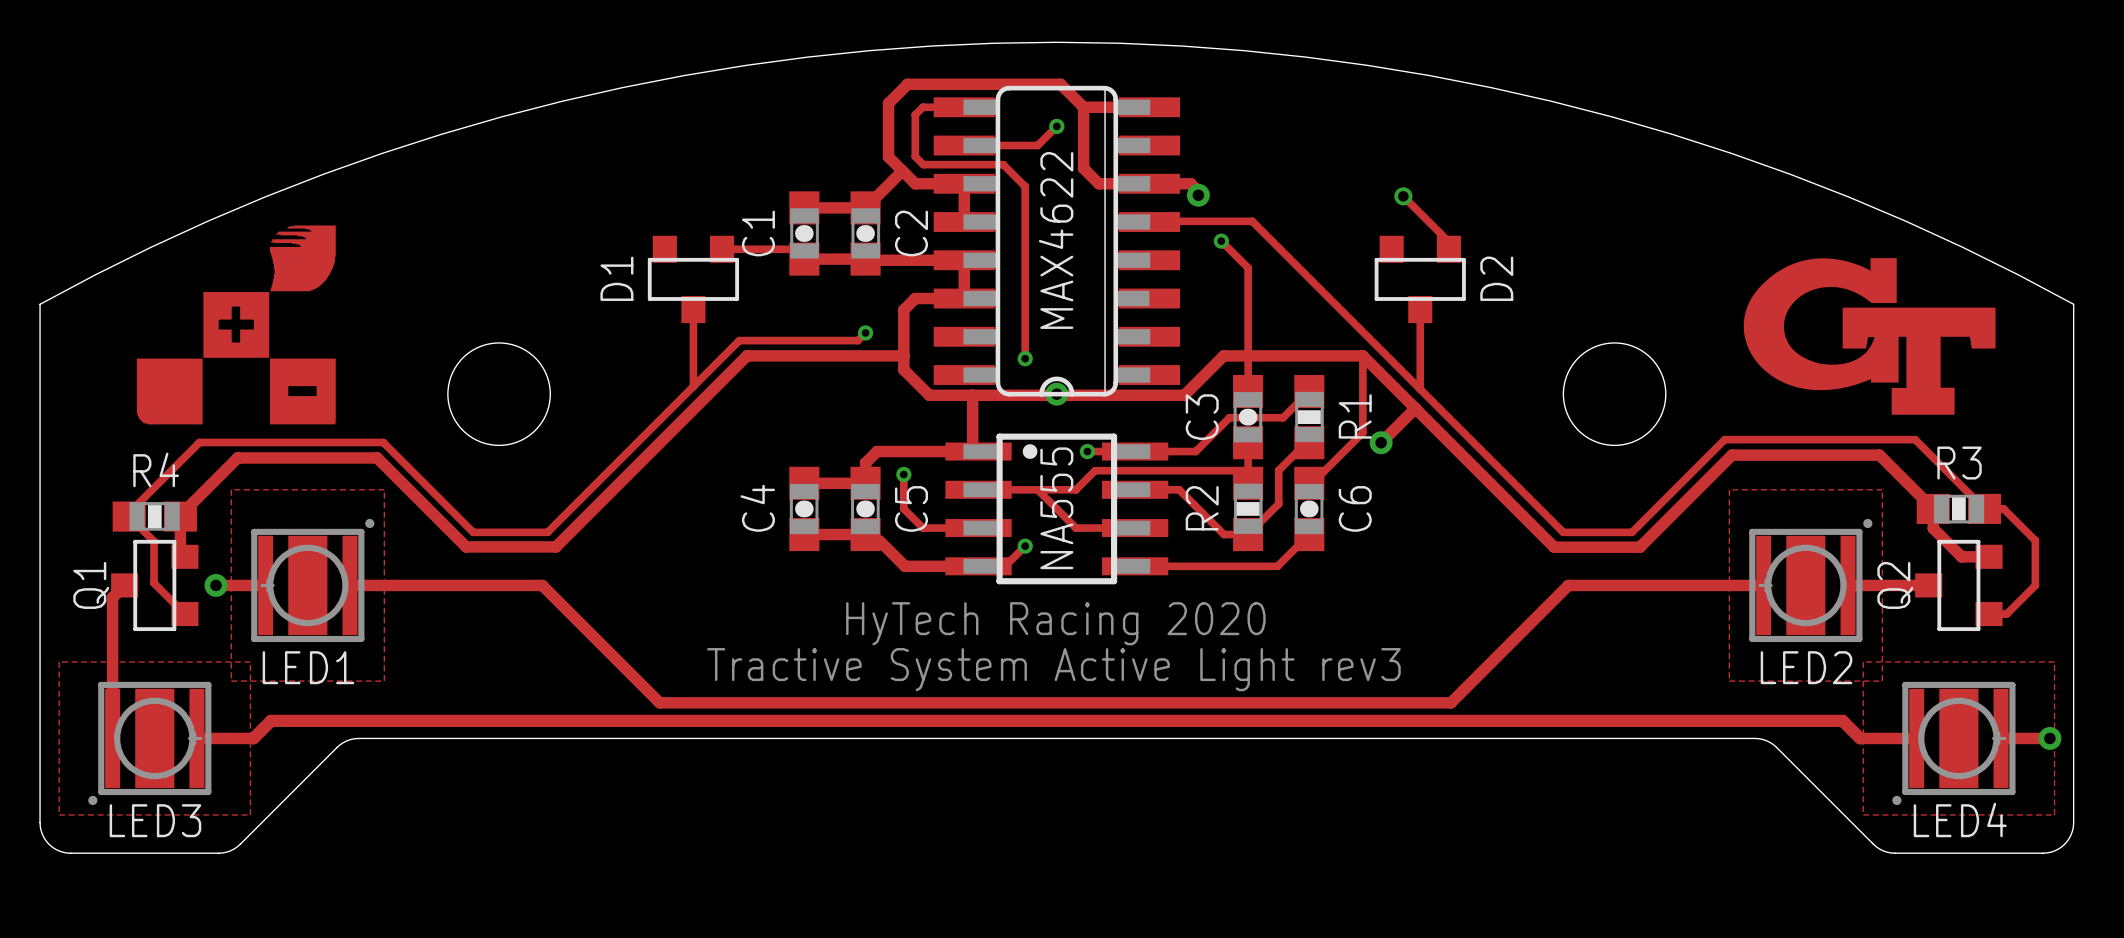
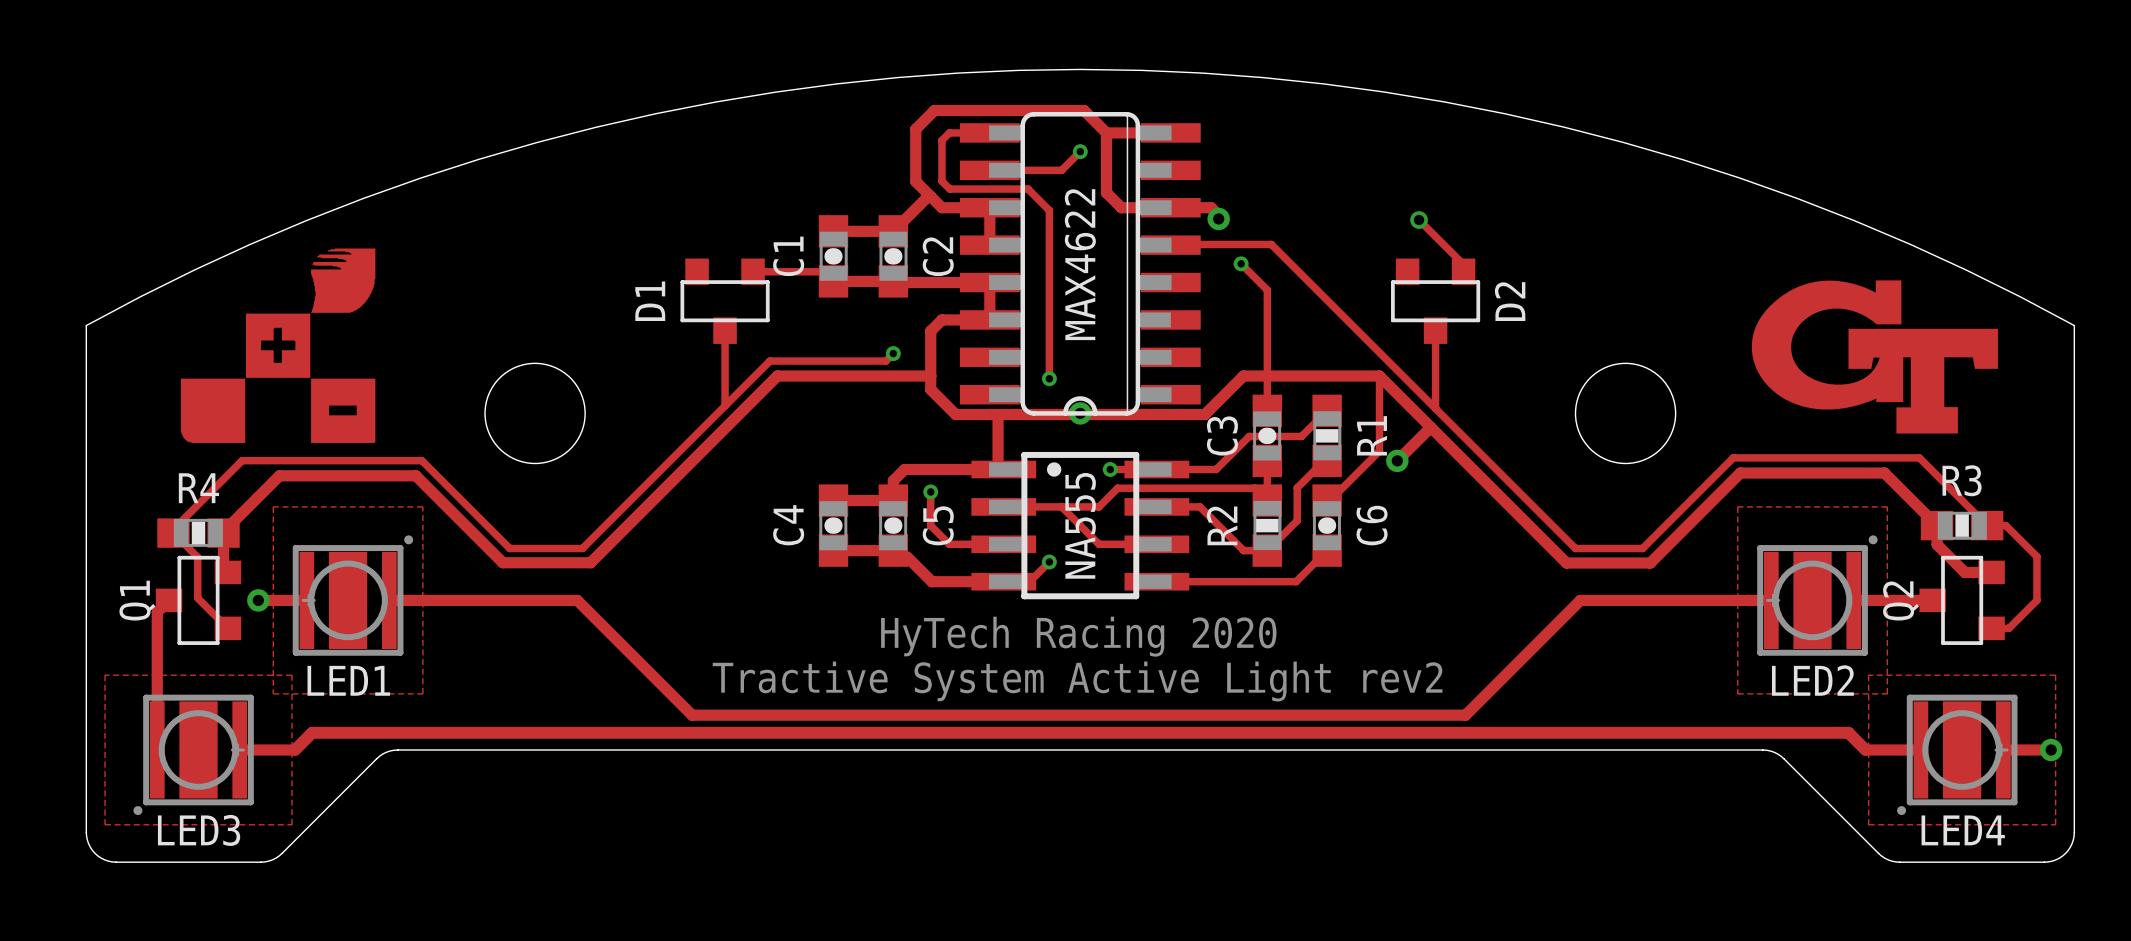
text: Tractive System Active Light rev3 (1053, 669) -> Tractive System Active Light rev2 (1077, 681)

